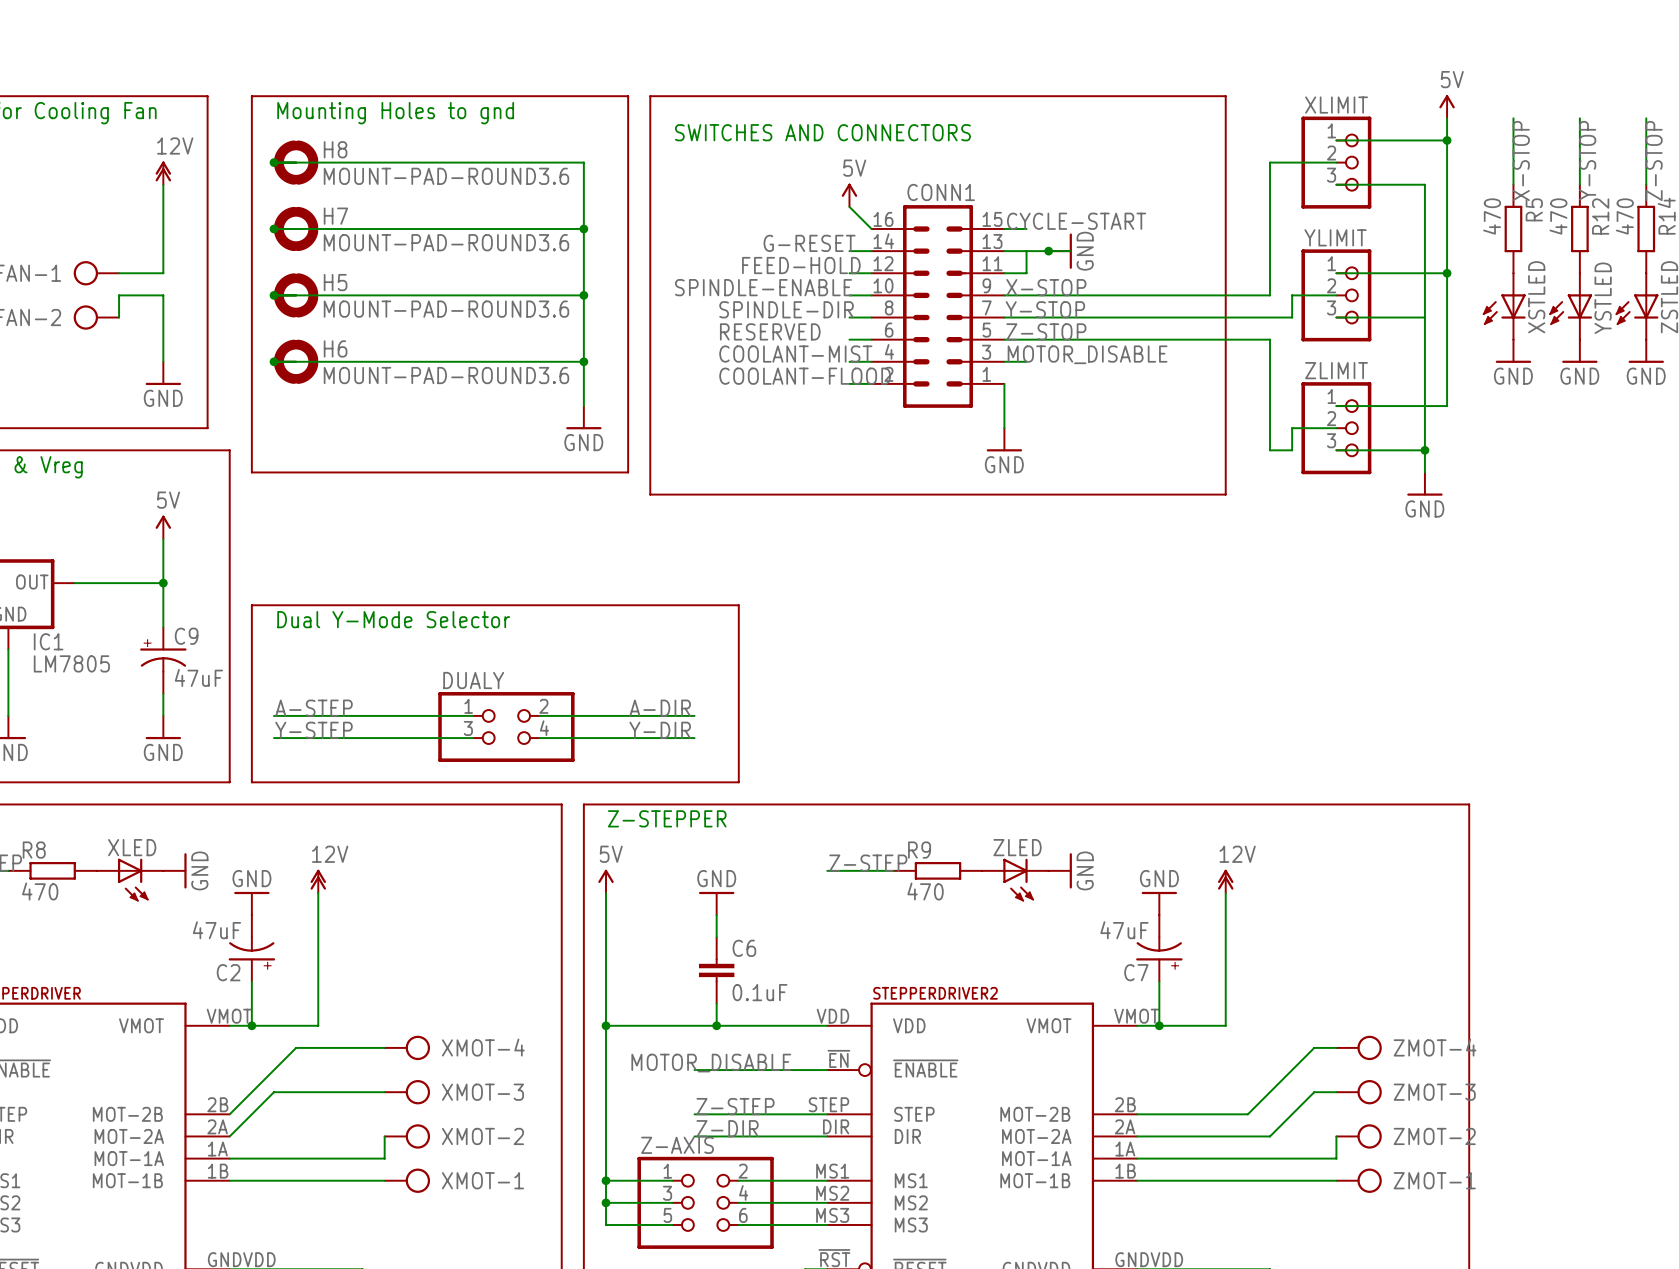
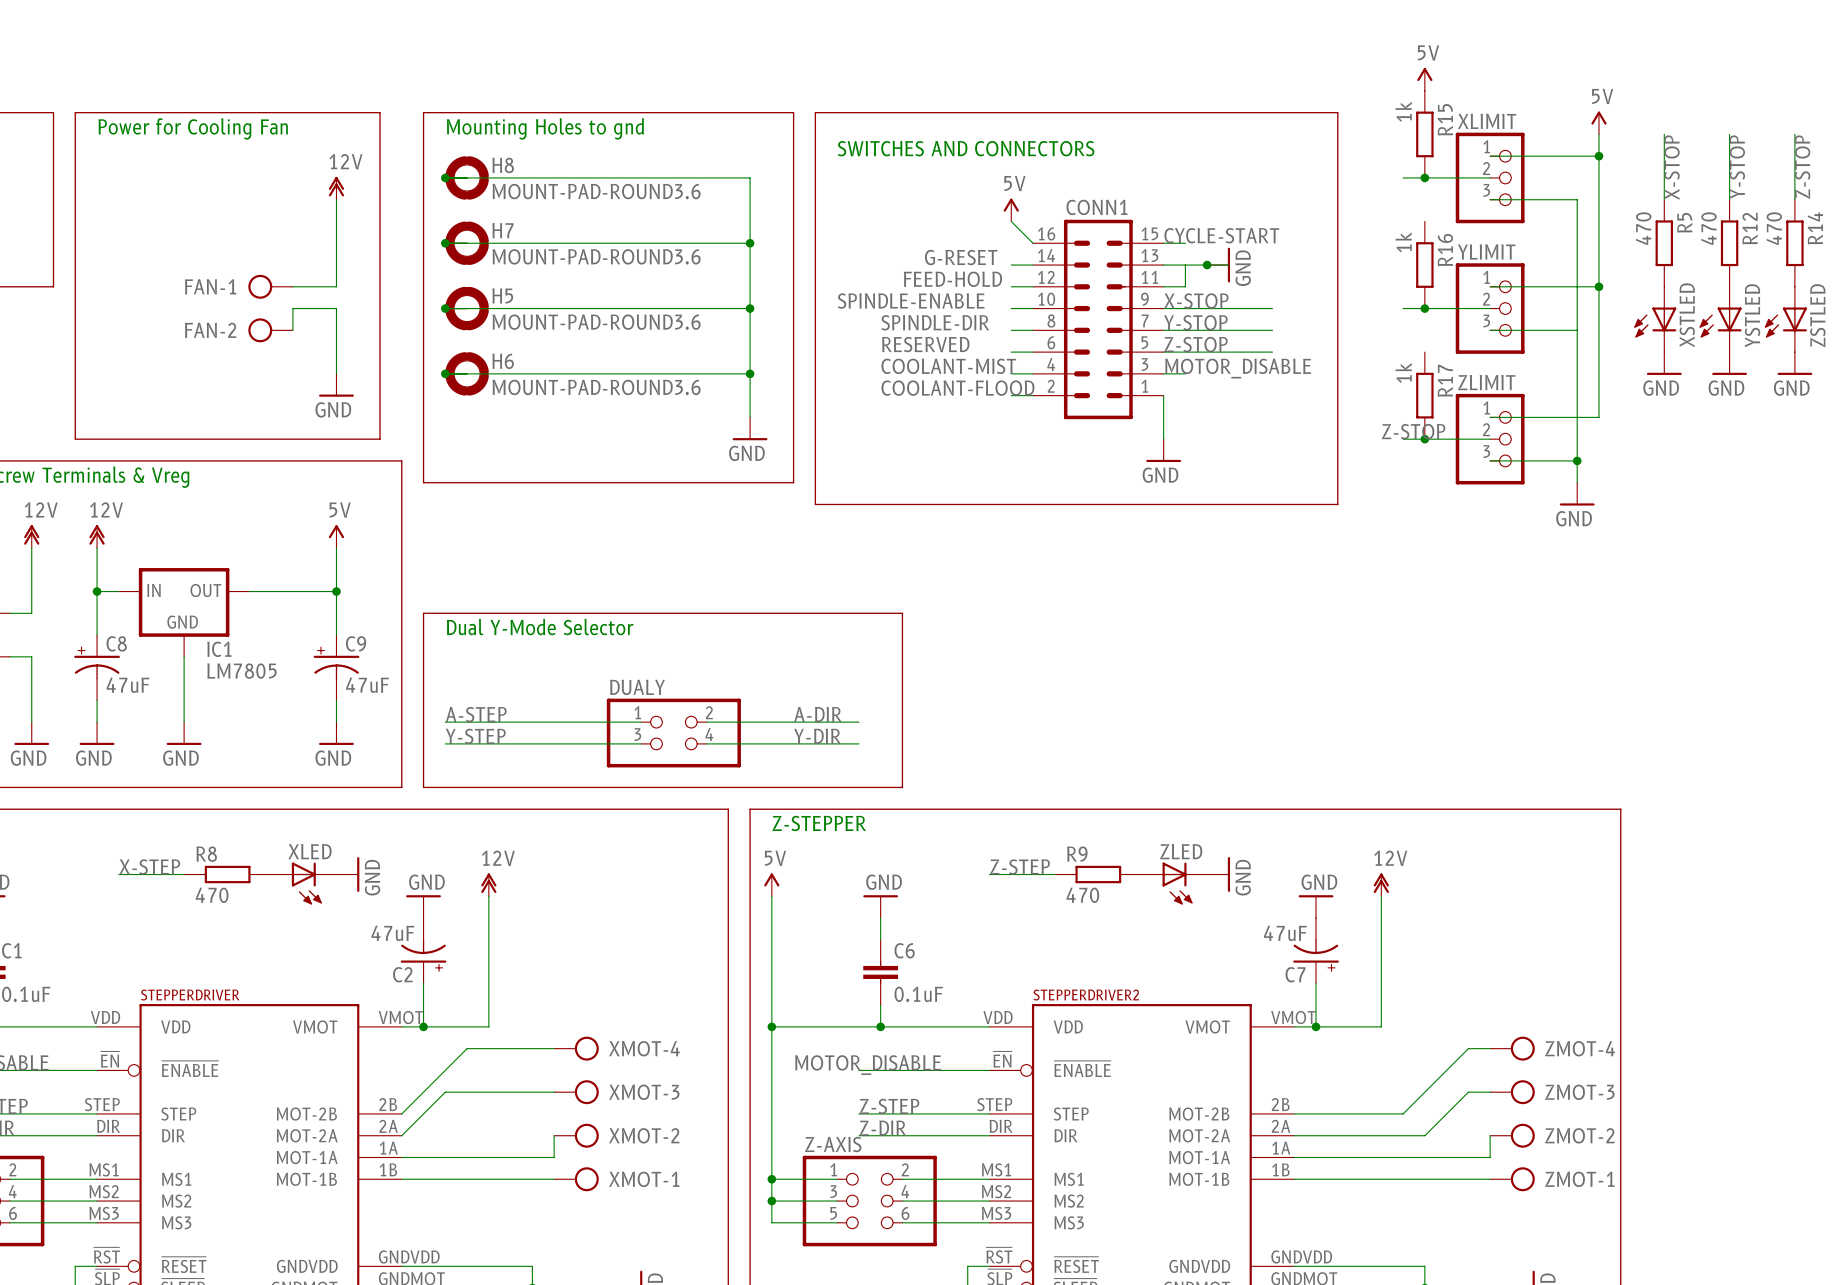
power symbol: none -> 5V (1424, 79)
line: (1181, 96) (1225, 96) (1225, 494) (1181, 494) -> (1337, 112) (1337, 504)
R15: none -> 1k (1424, 134)
wire: (1270, 162) (1270, 295) -> (1424, 177) (1403, 177)
junction: none -> (1424, 177)
R16: none -> 1k (1424, 265)
wire: (1115, 295) (1247, 295) -> none
junction: none -> (1424, 308)
wire: (1292, 295) (1292, 317) (1115, 317) -> (1446, 308) (1424, 308)
wire: (1115, 339) (1270, 339) (1270, 450) (1292, 450) (1292, 428) -> (1403, 439) (1446, 439)
R17: none -> 1k (1424, 395)
label: none -> Z-STOP (1413, 431)
junction: none -> (1424, 439)

